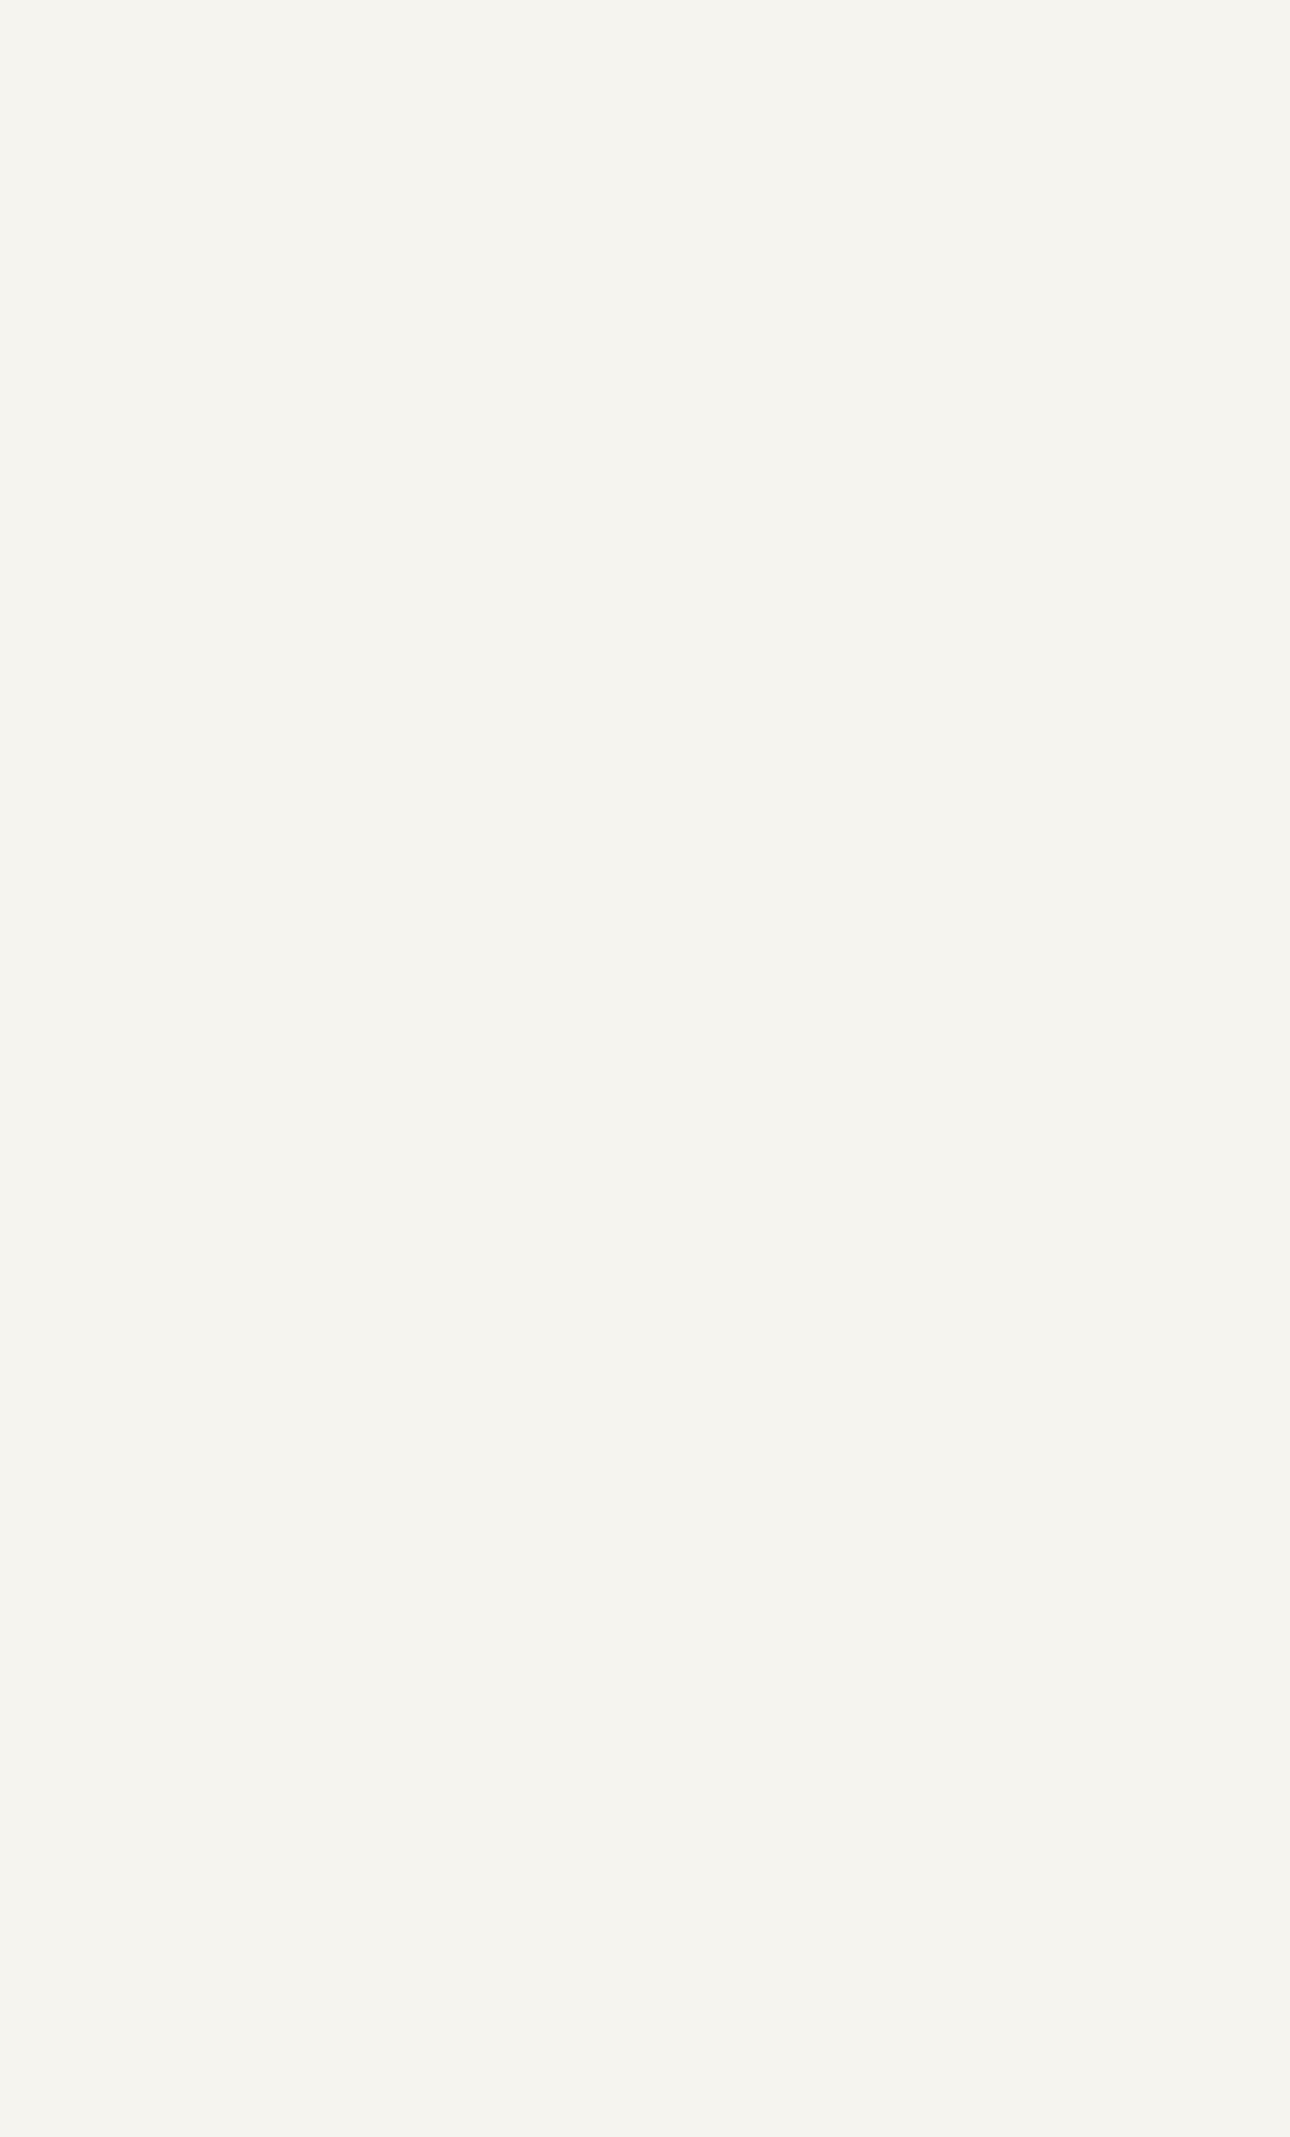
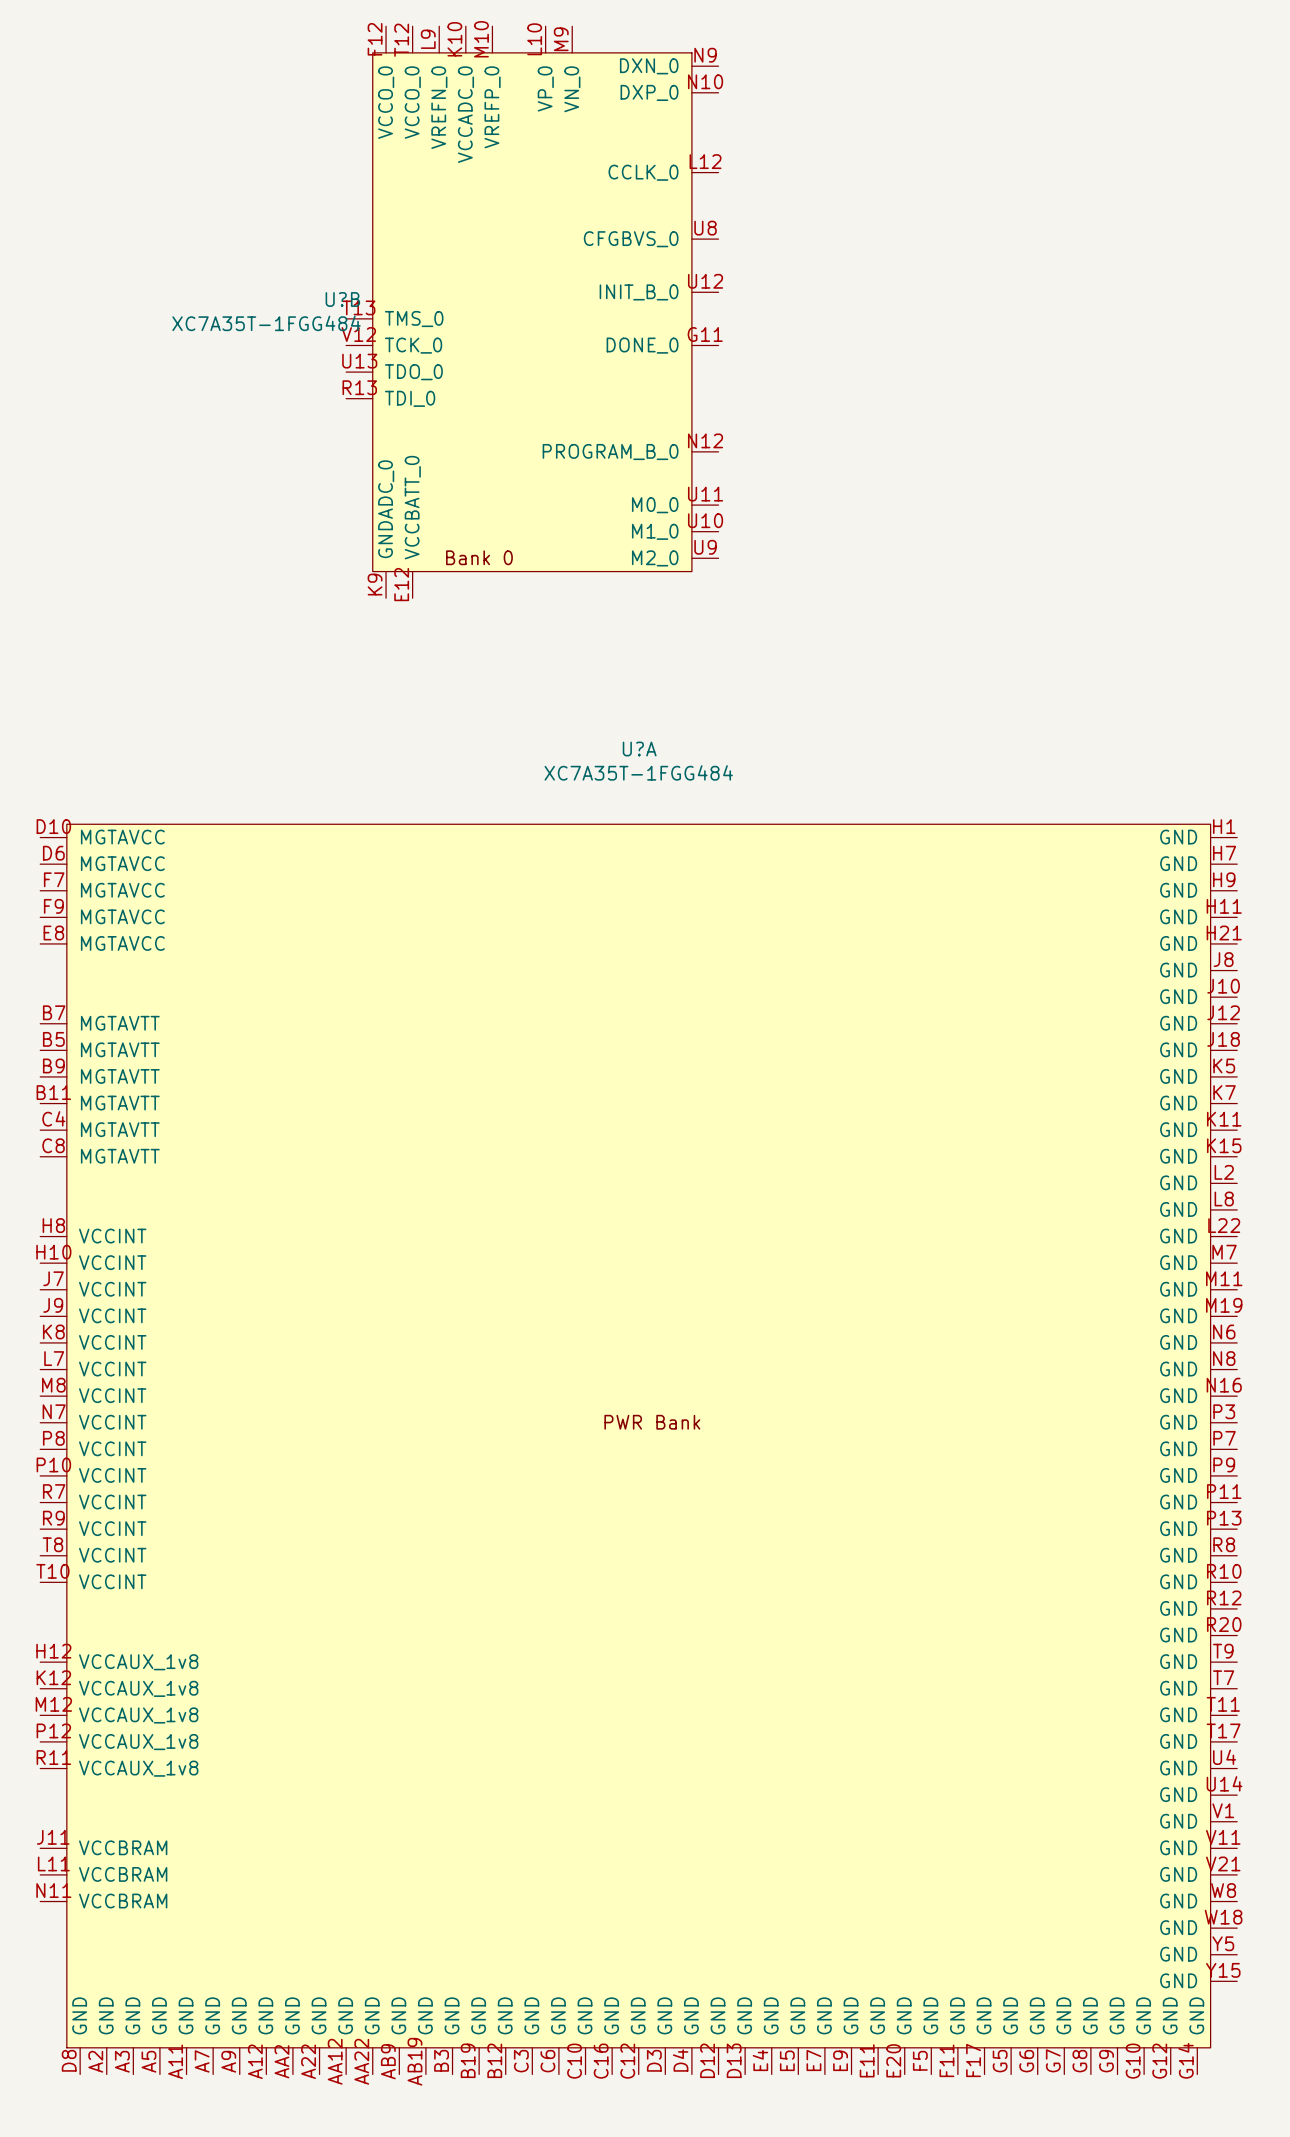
U?B: none -> XC7A35T-1FGG484 (532, 312)
U?A: none -> XC7A35T-1FGG484 (638, 1449)

